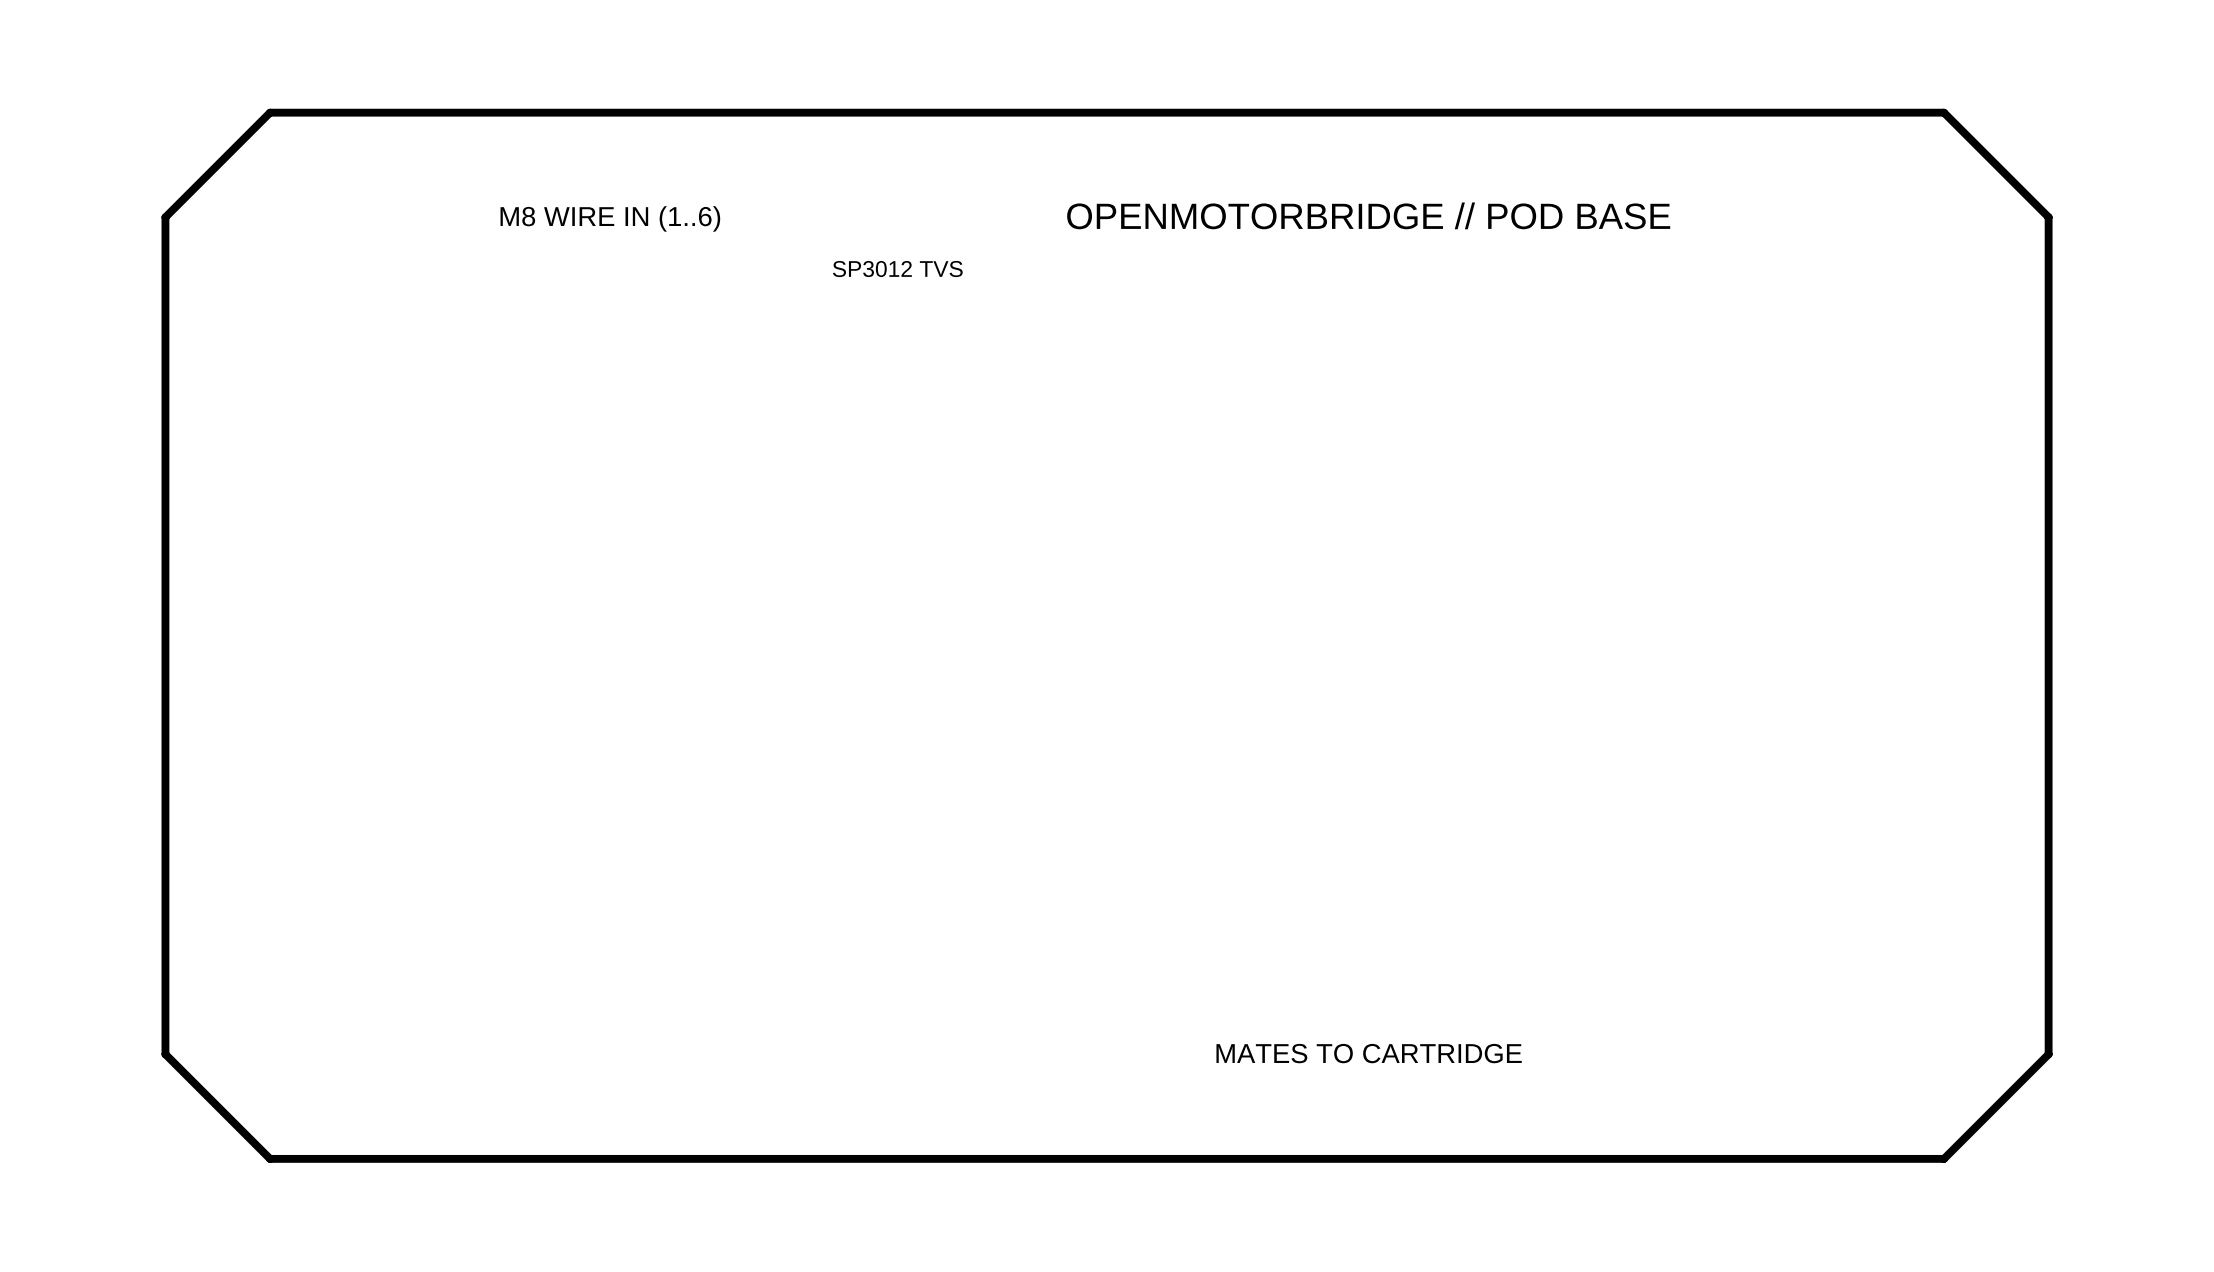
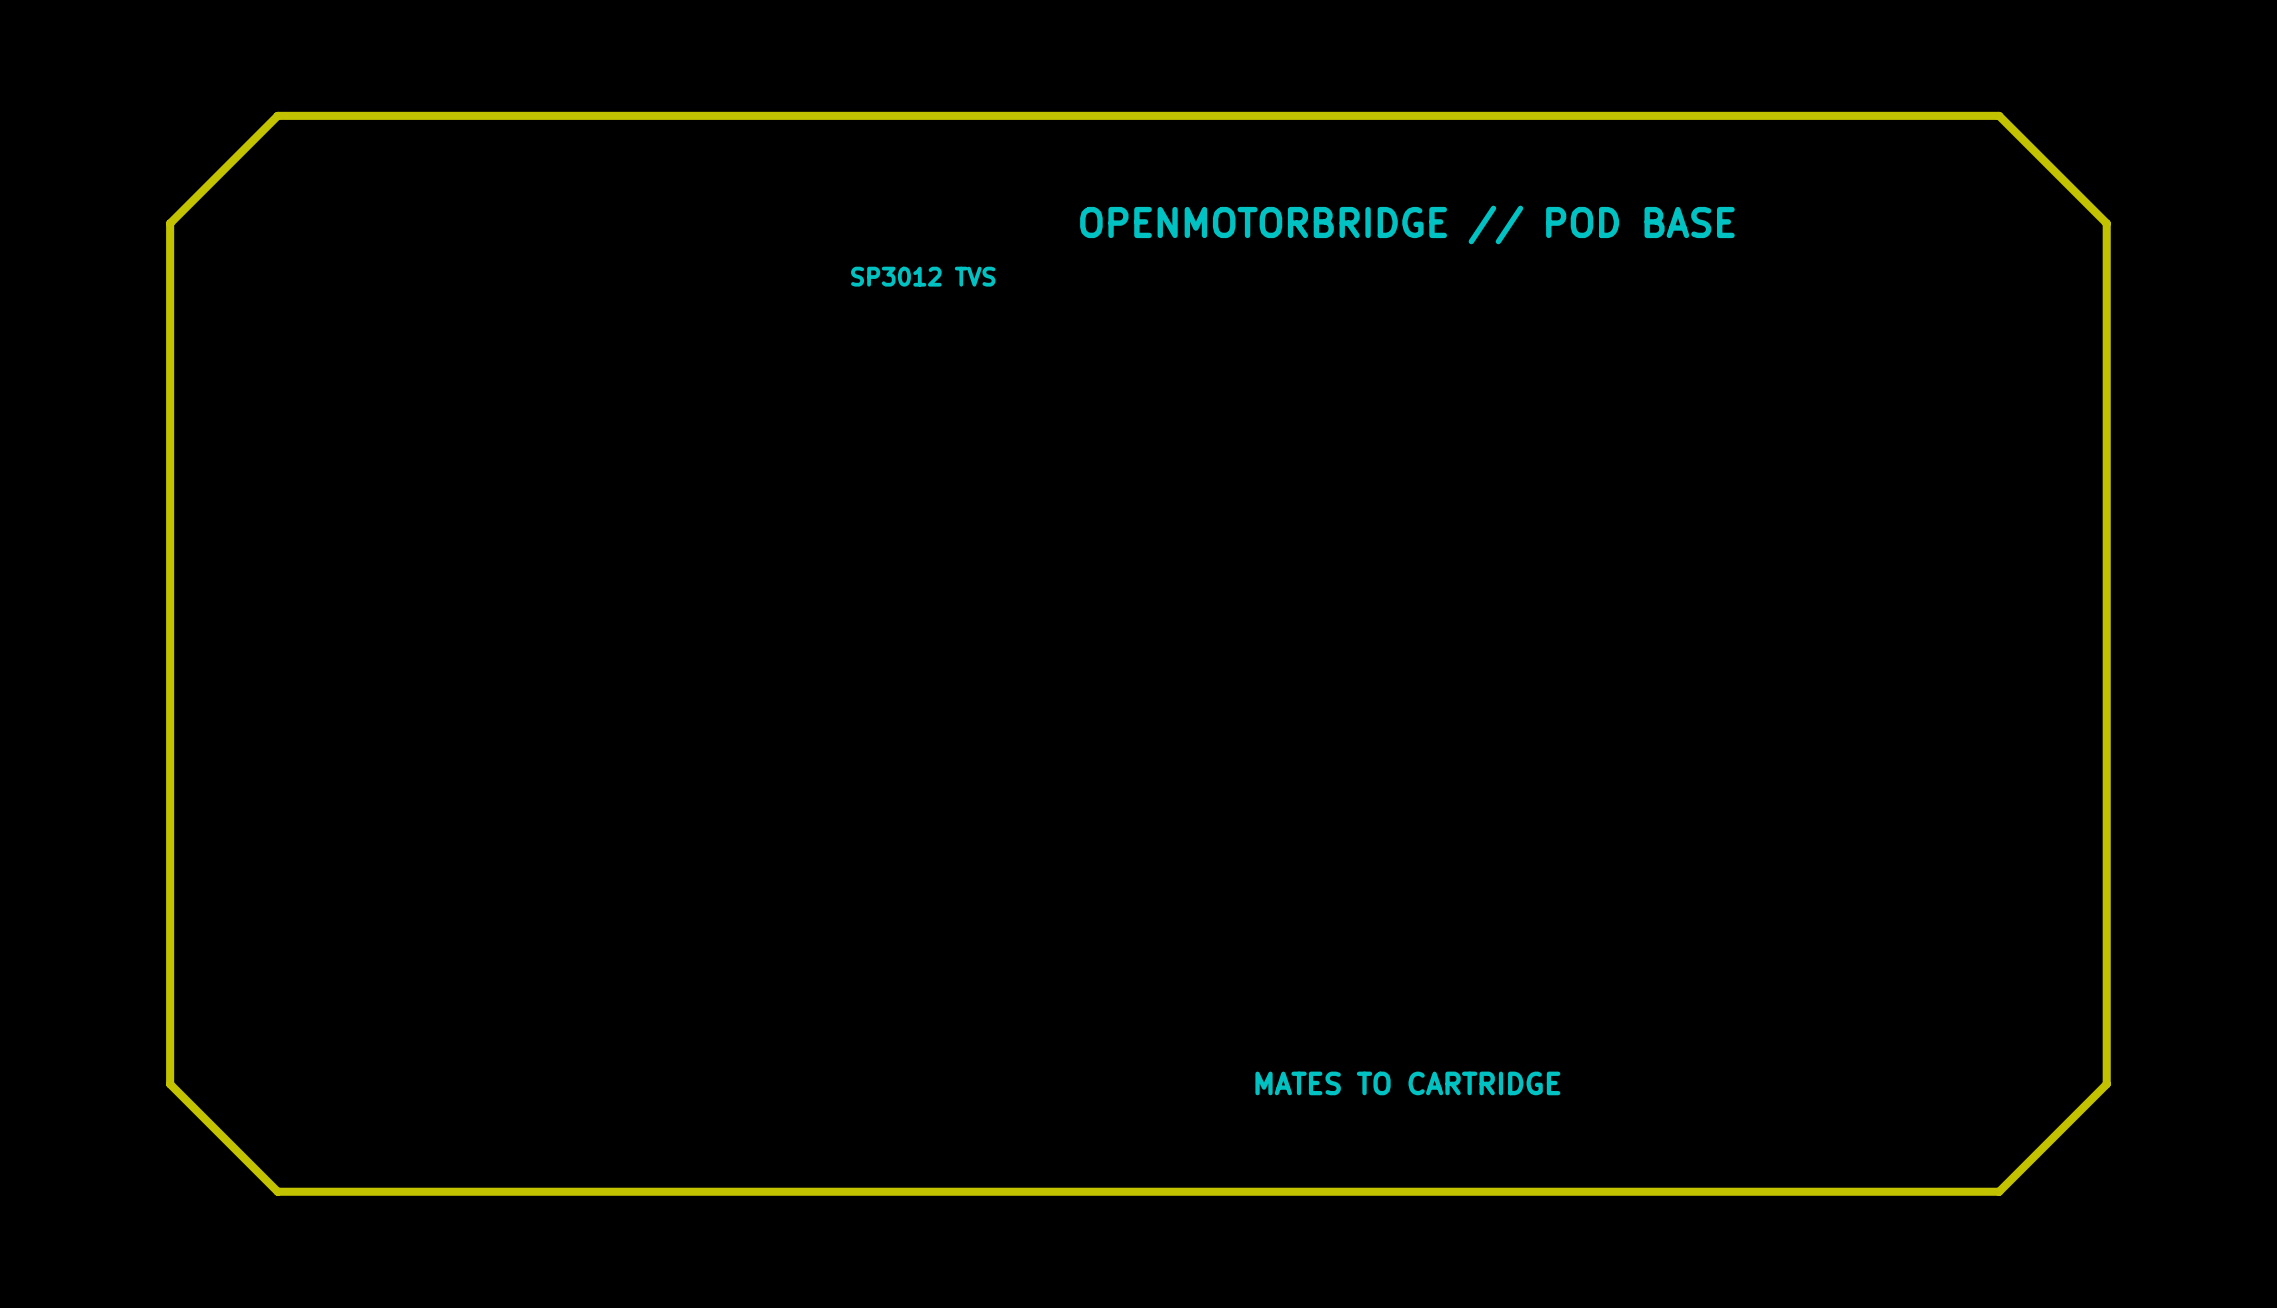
text: M8 WIRE IN (1..6) (610, 218) -> none

